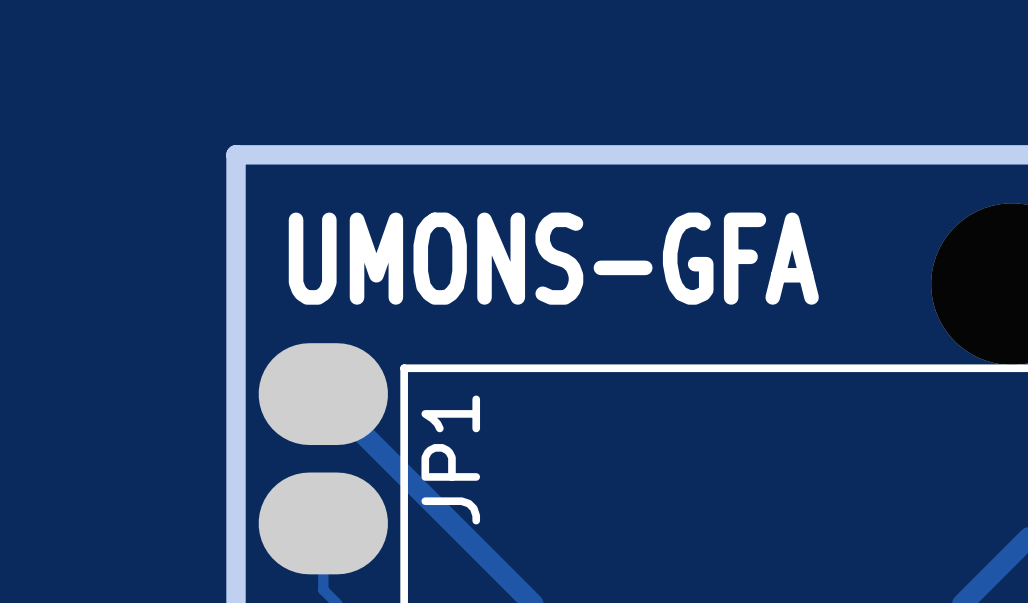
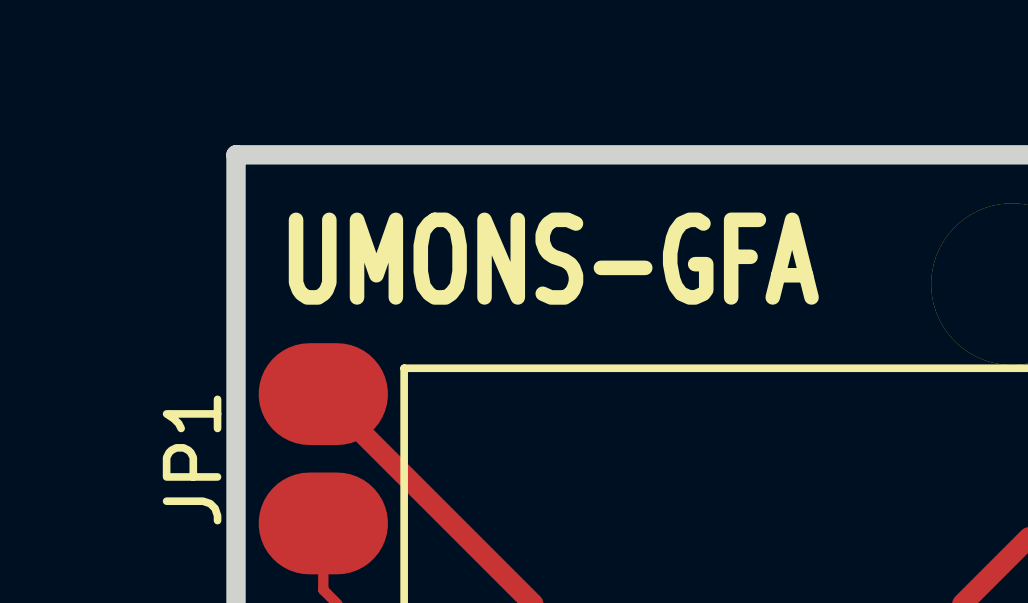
JP1 name position: JP1 (450, 459) -> JP1 (192, 459)

